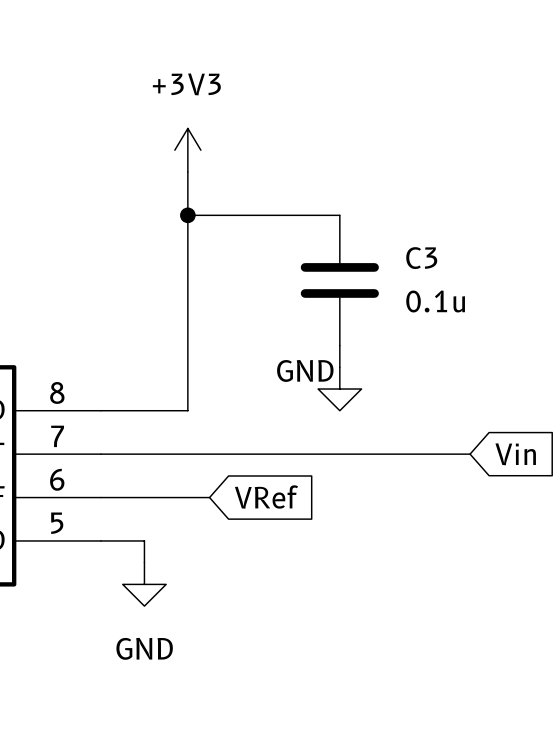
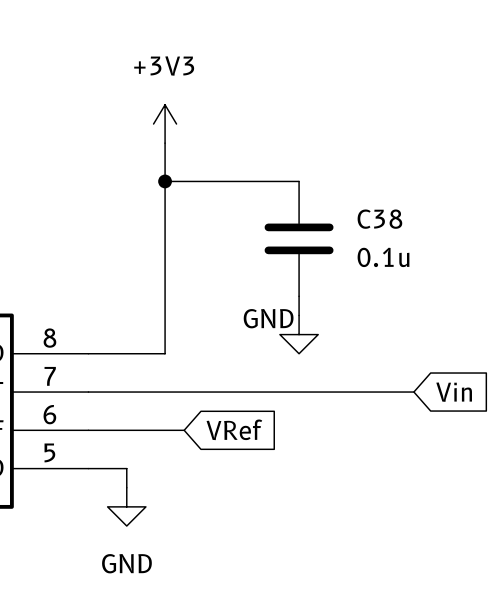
C3 name: C3 (421, 258) -> C38 (379, 219)

